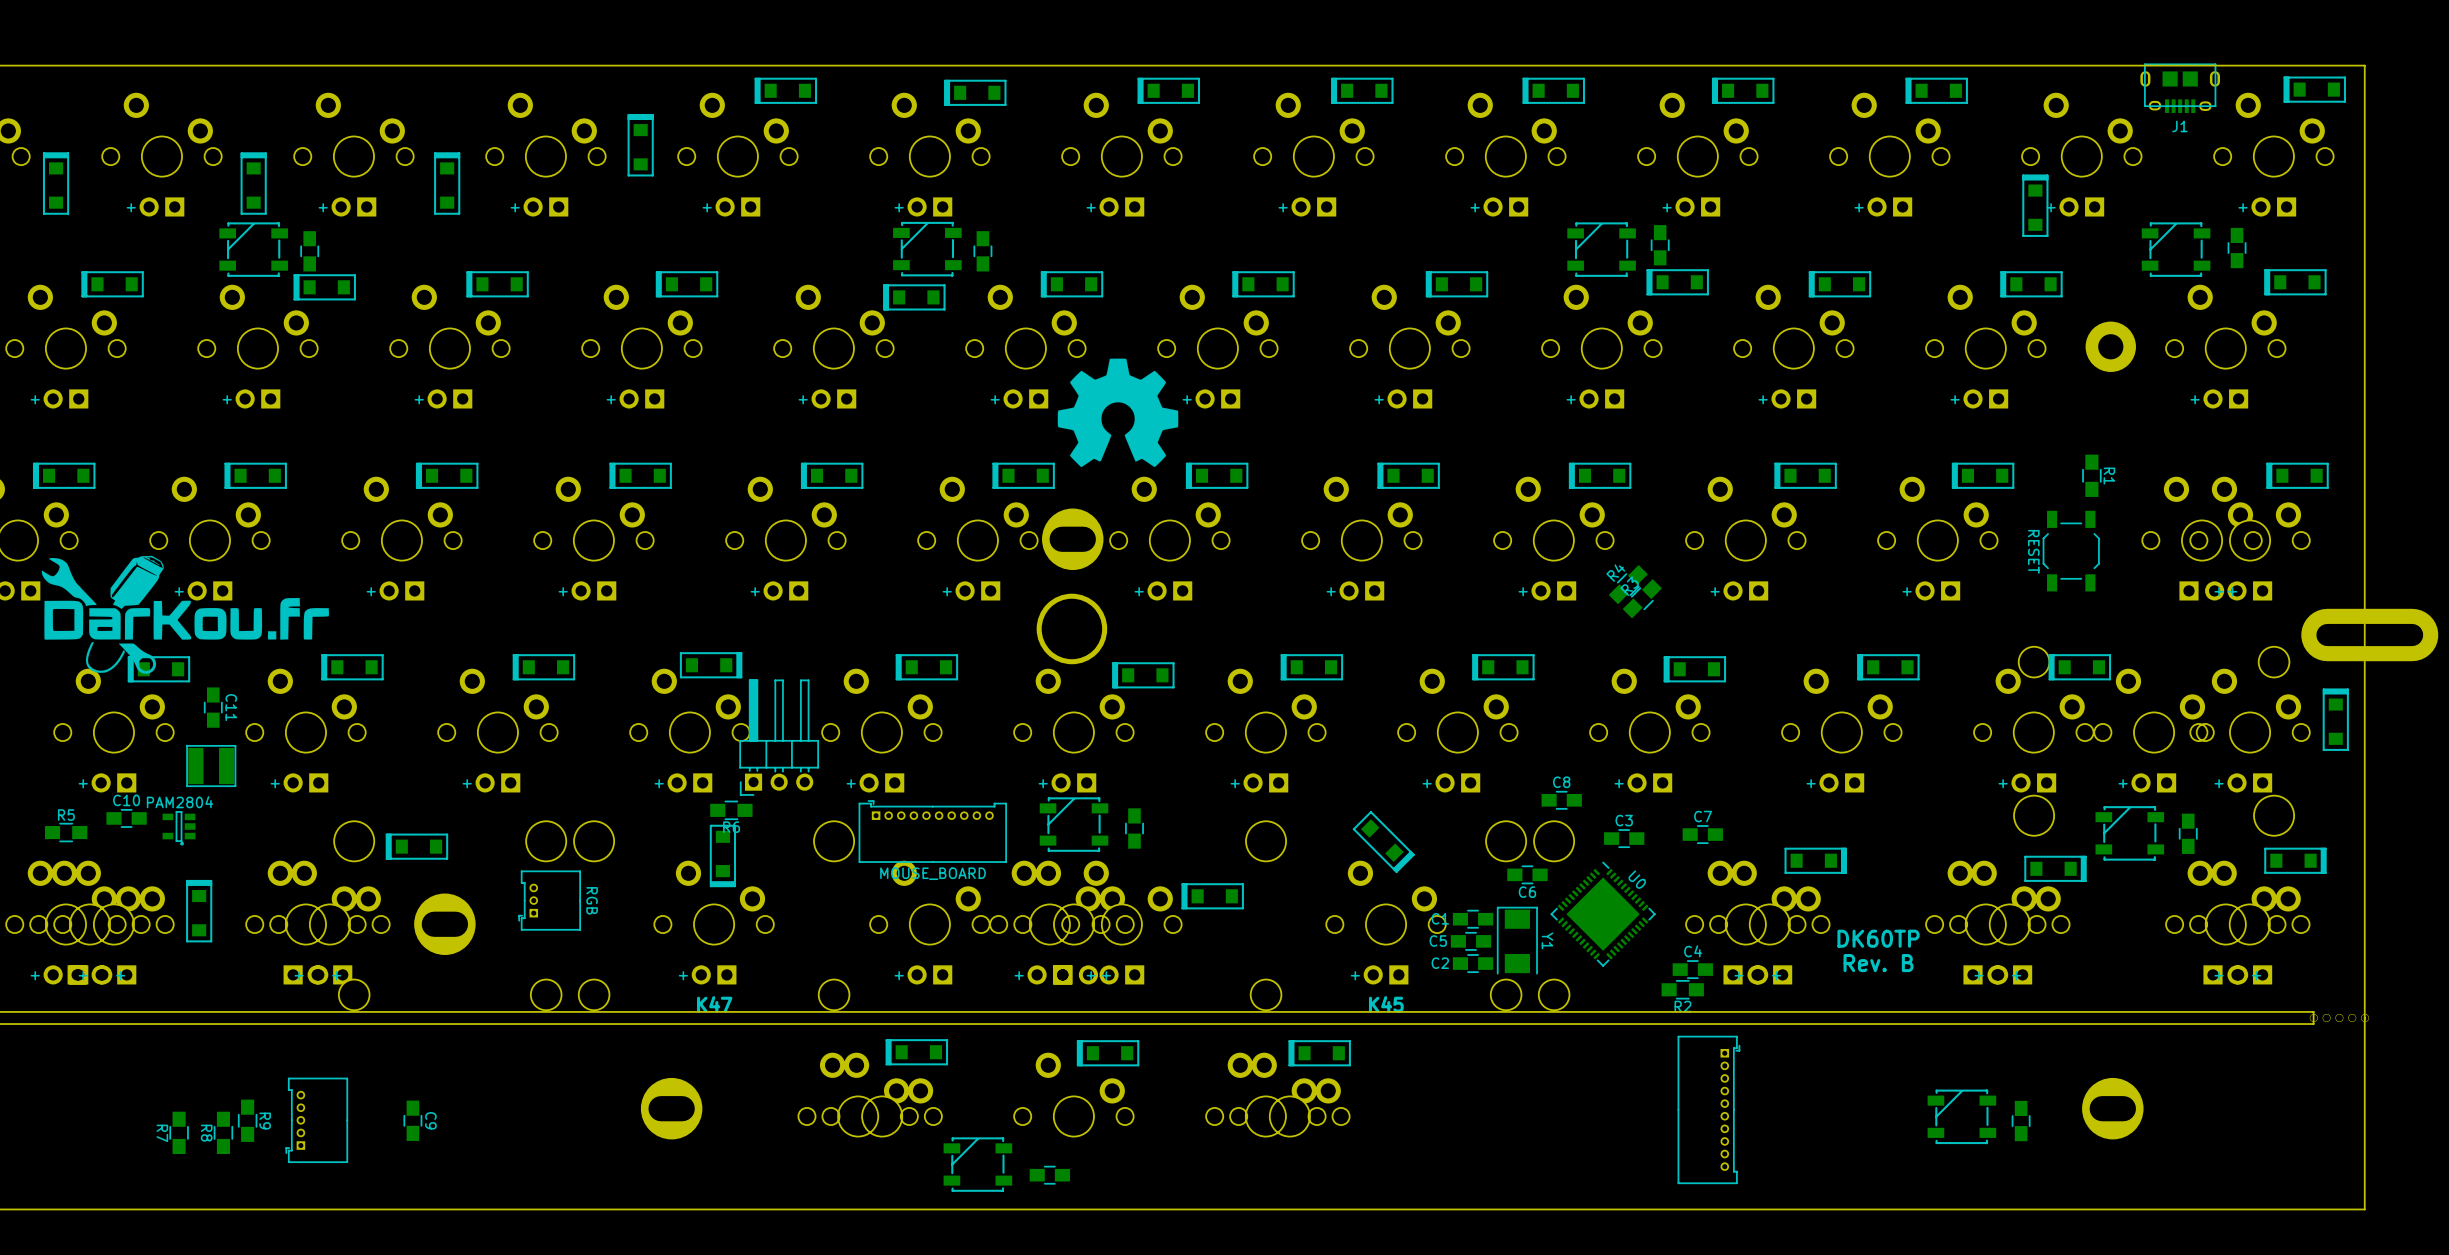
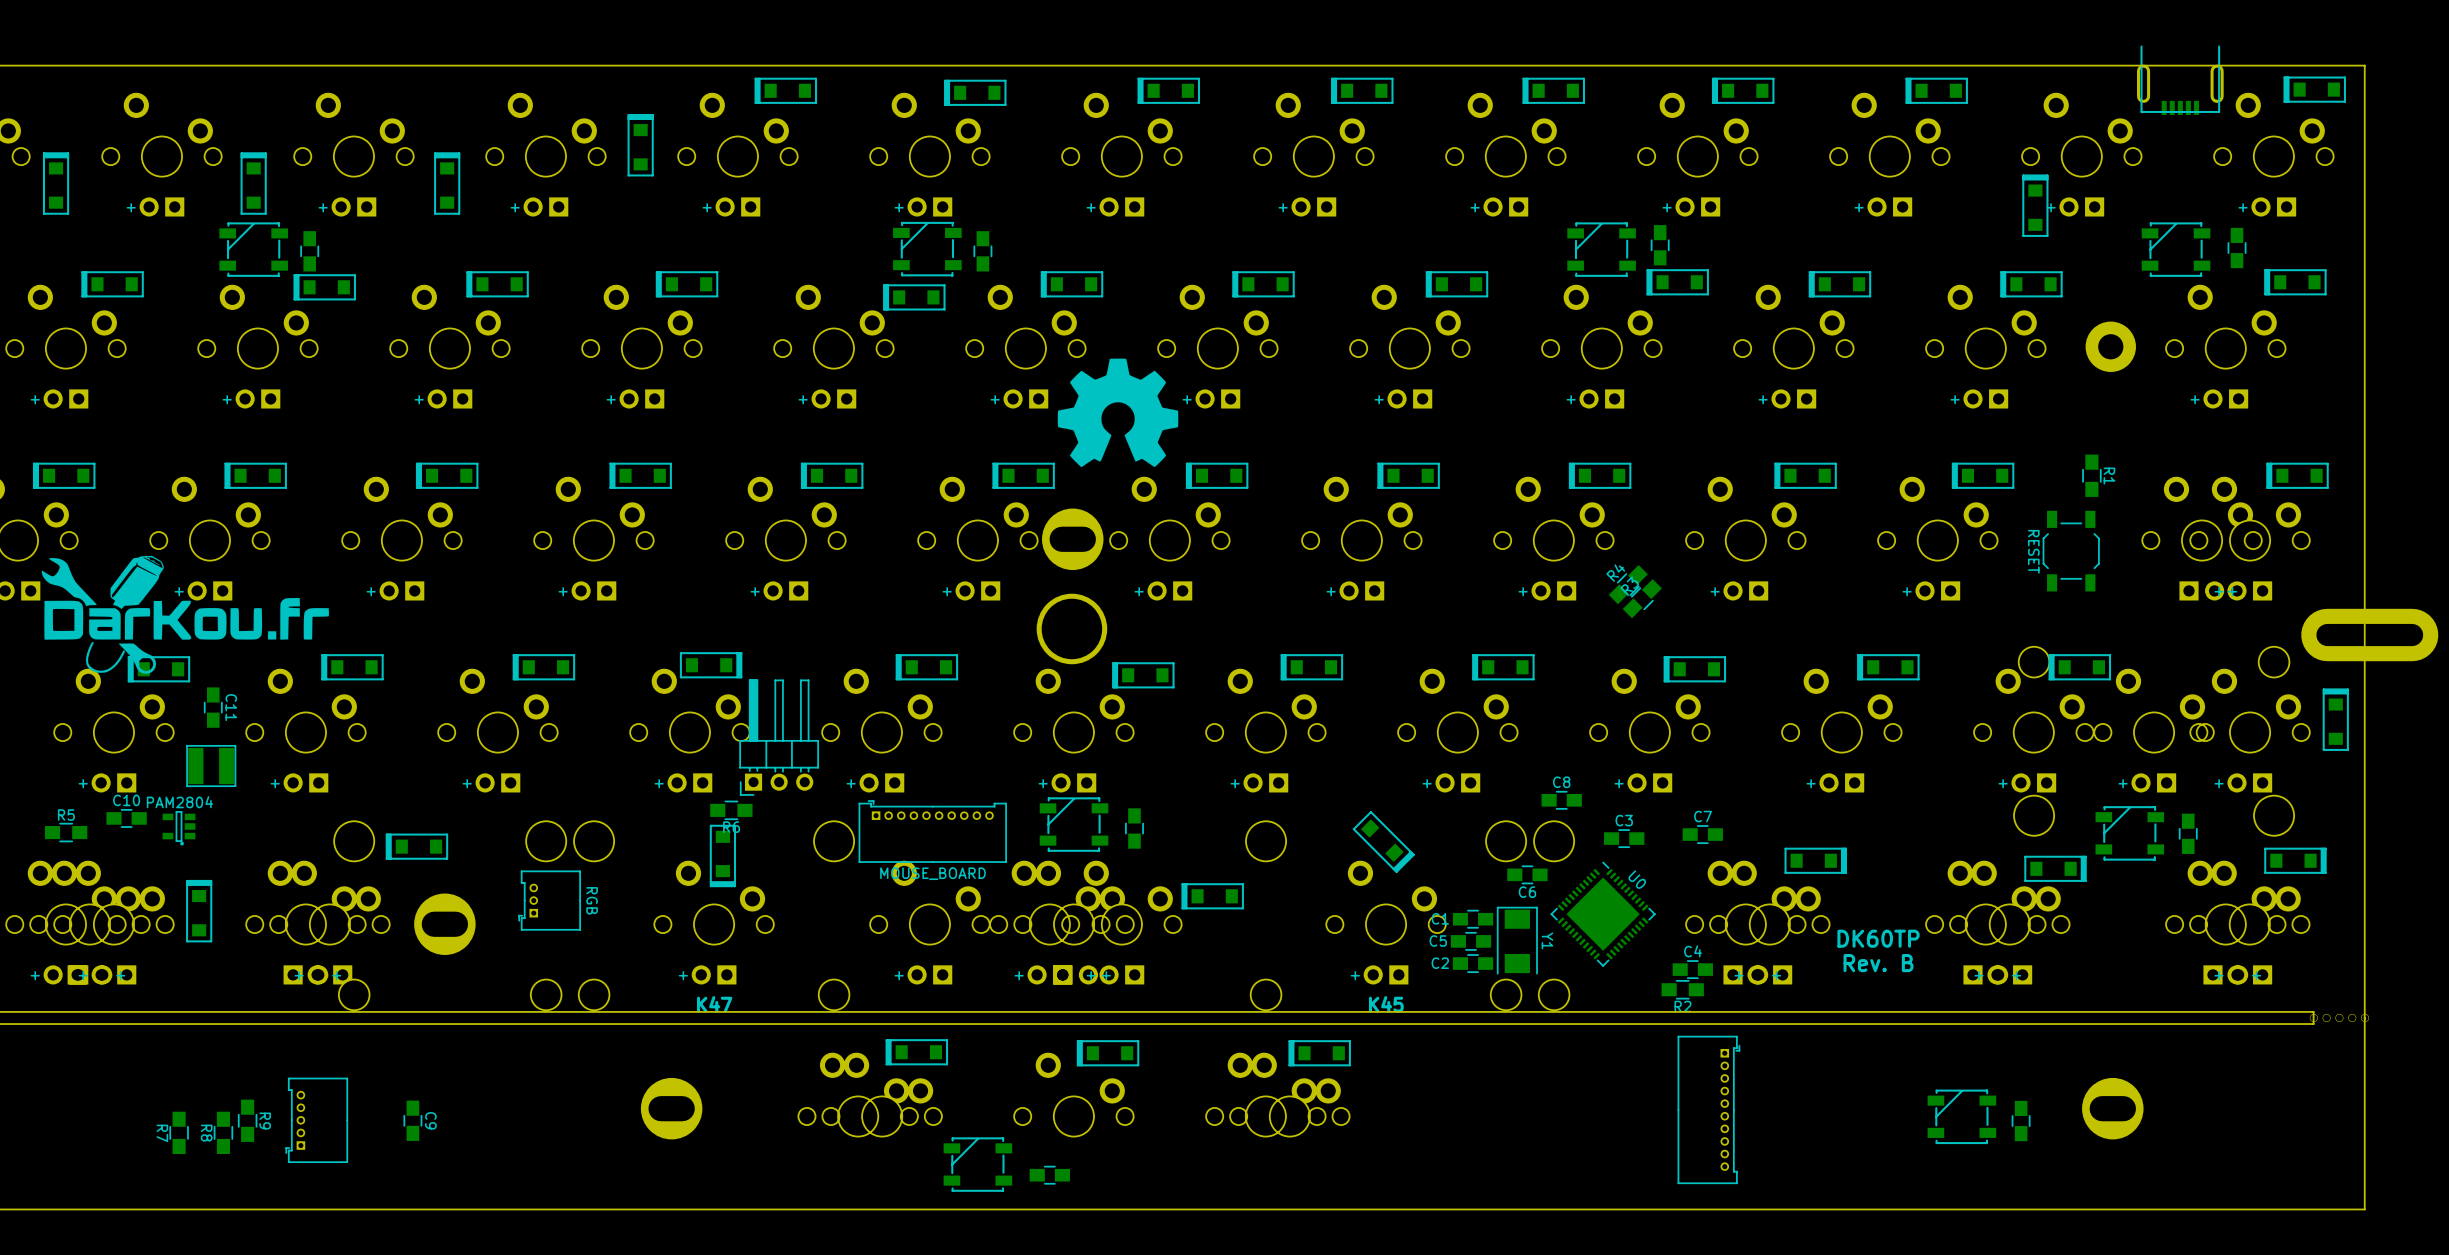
part: none -> (2180, 80)
J1: (2180, 88) -> none

